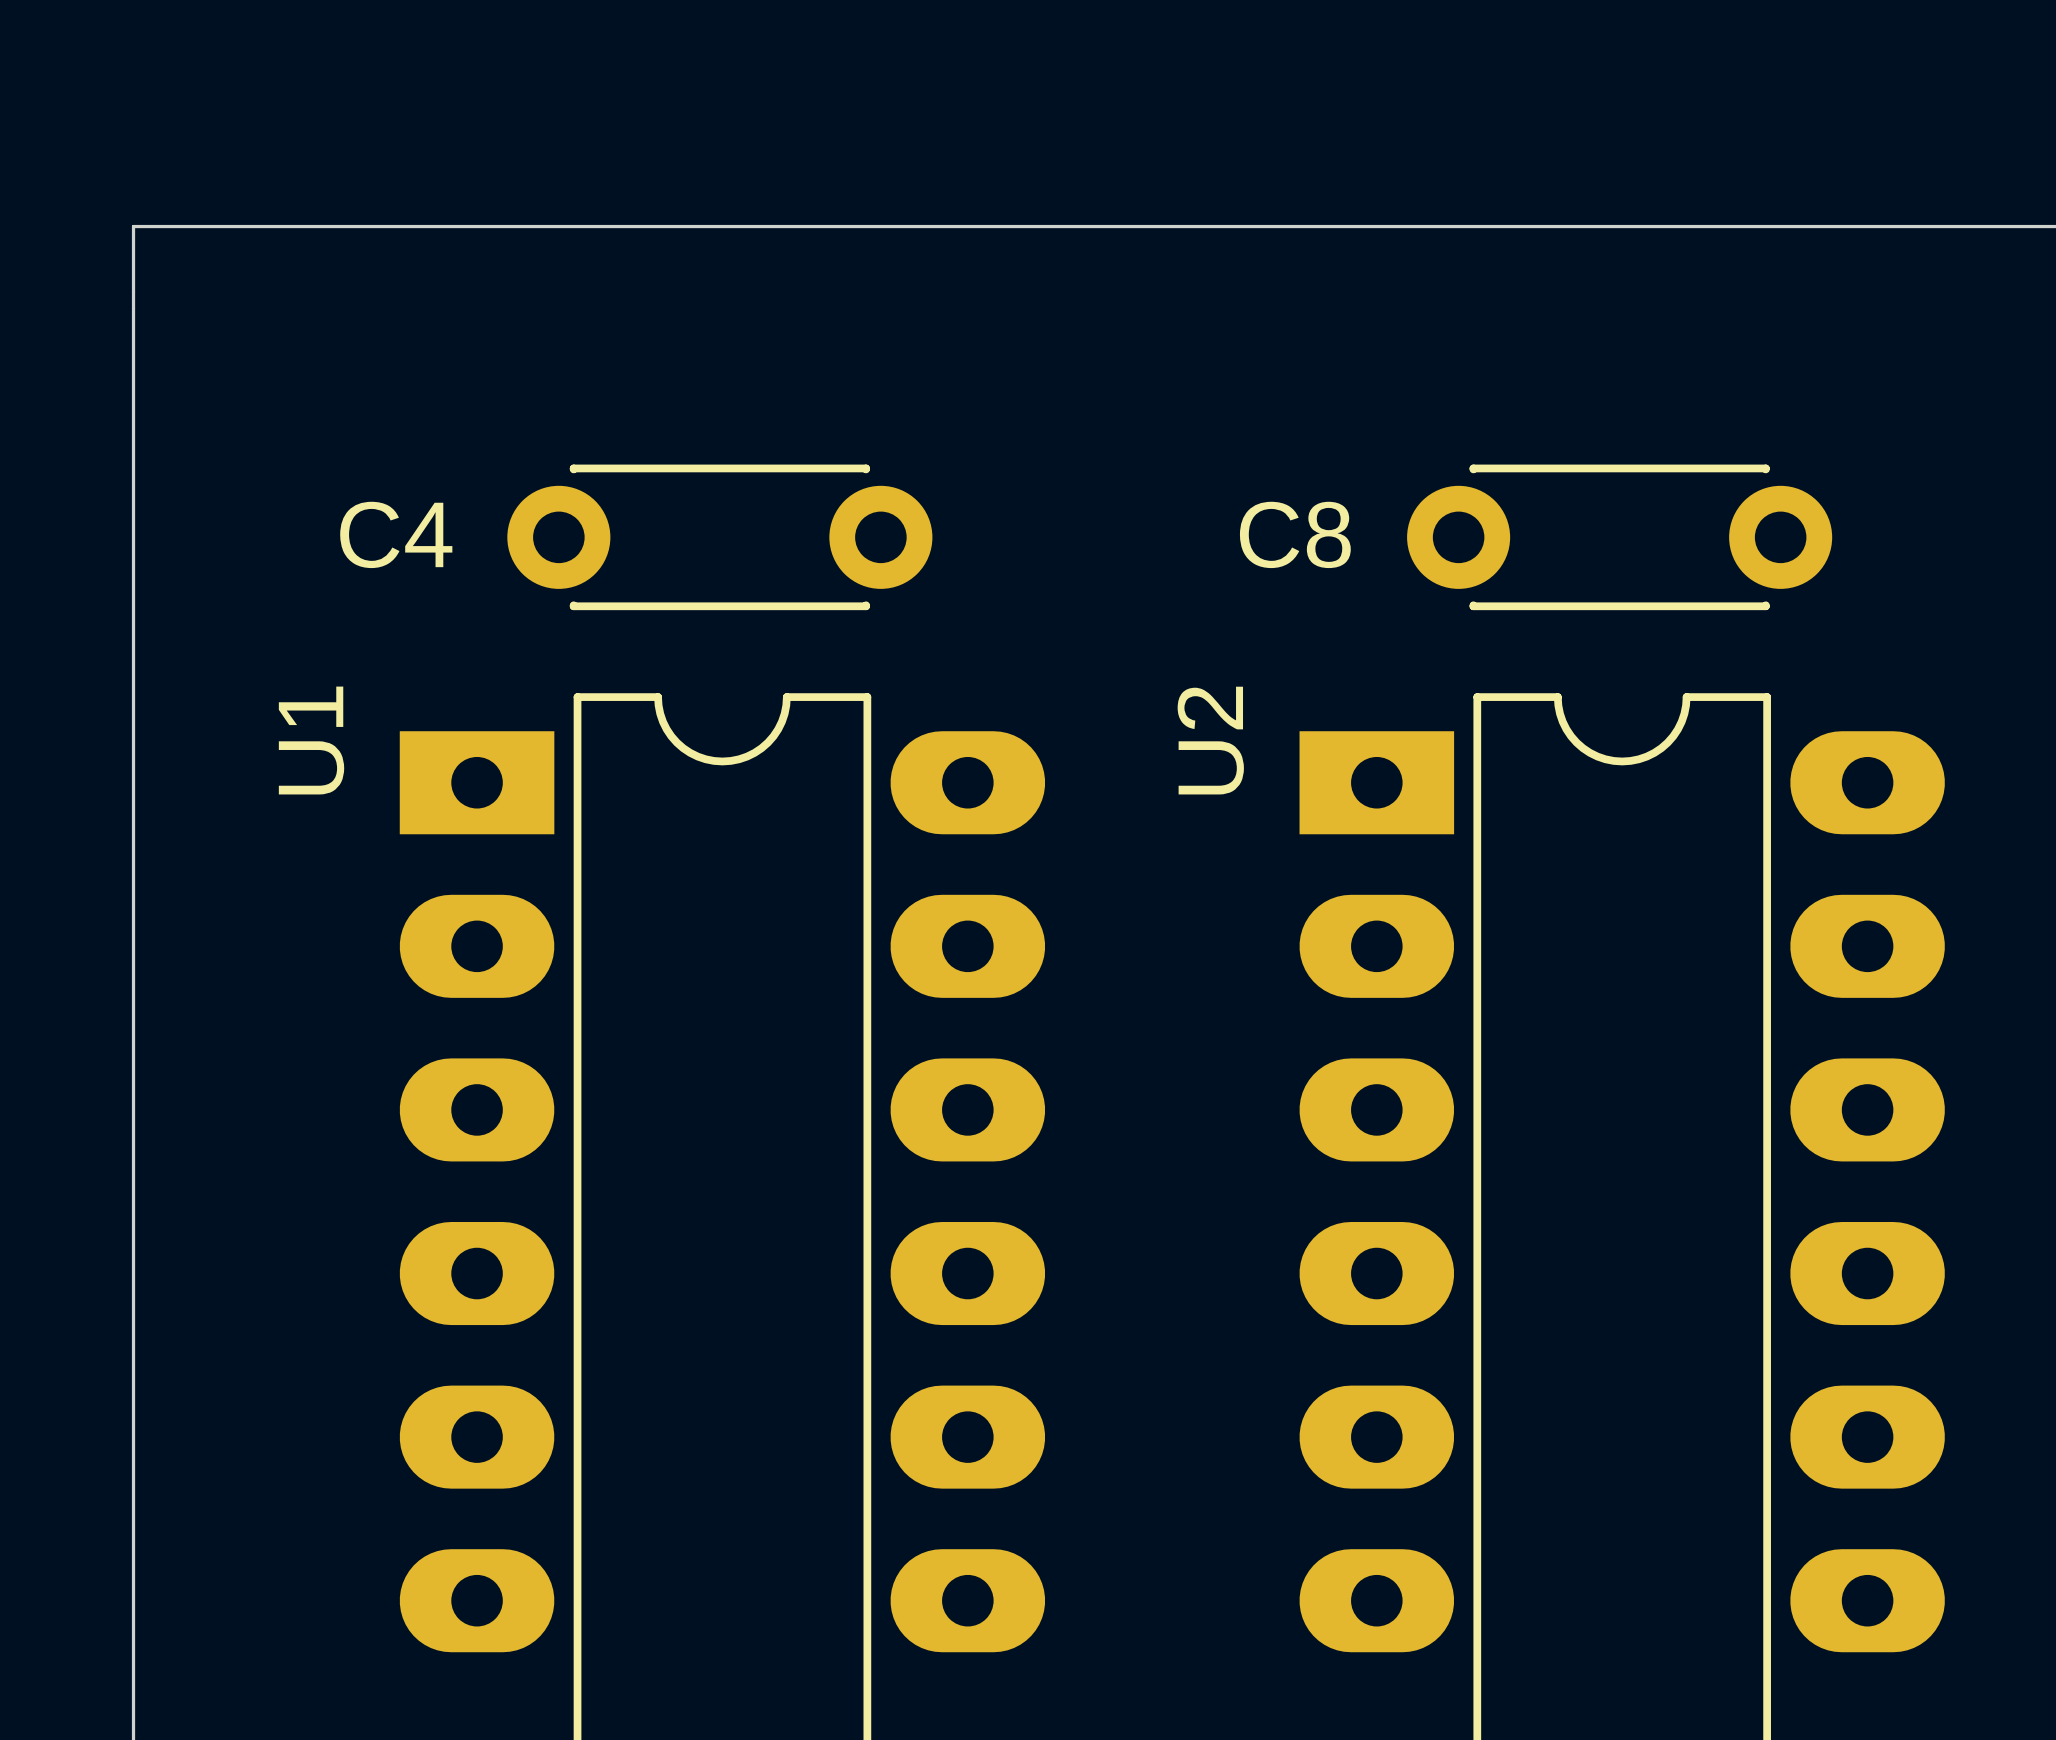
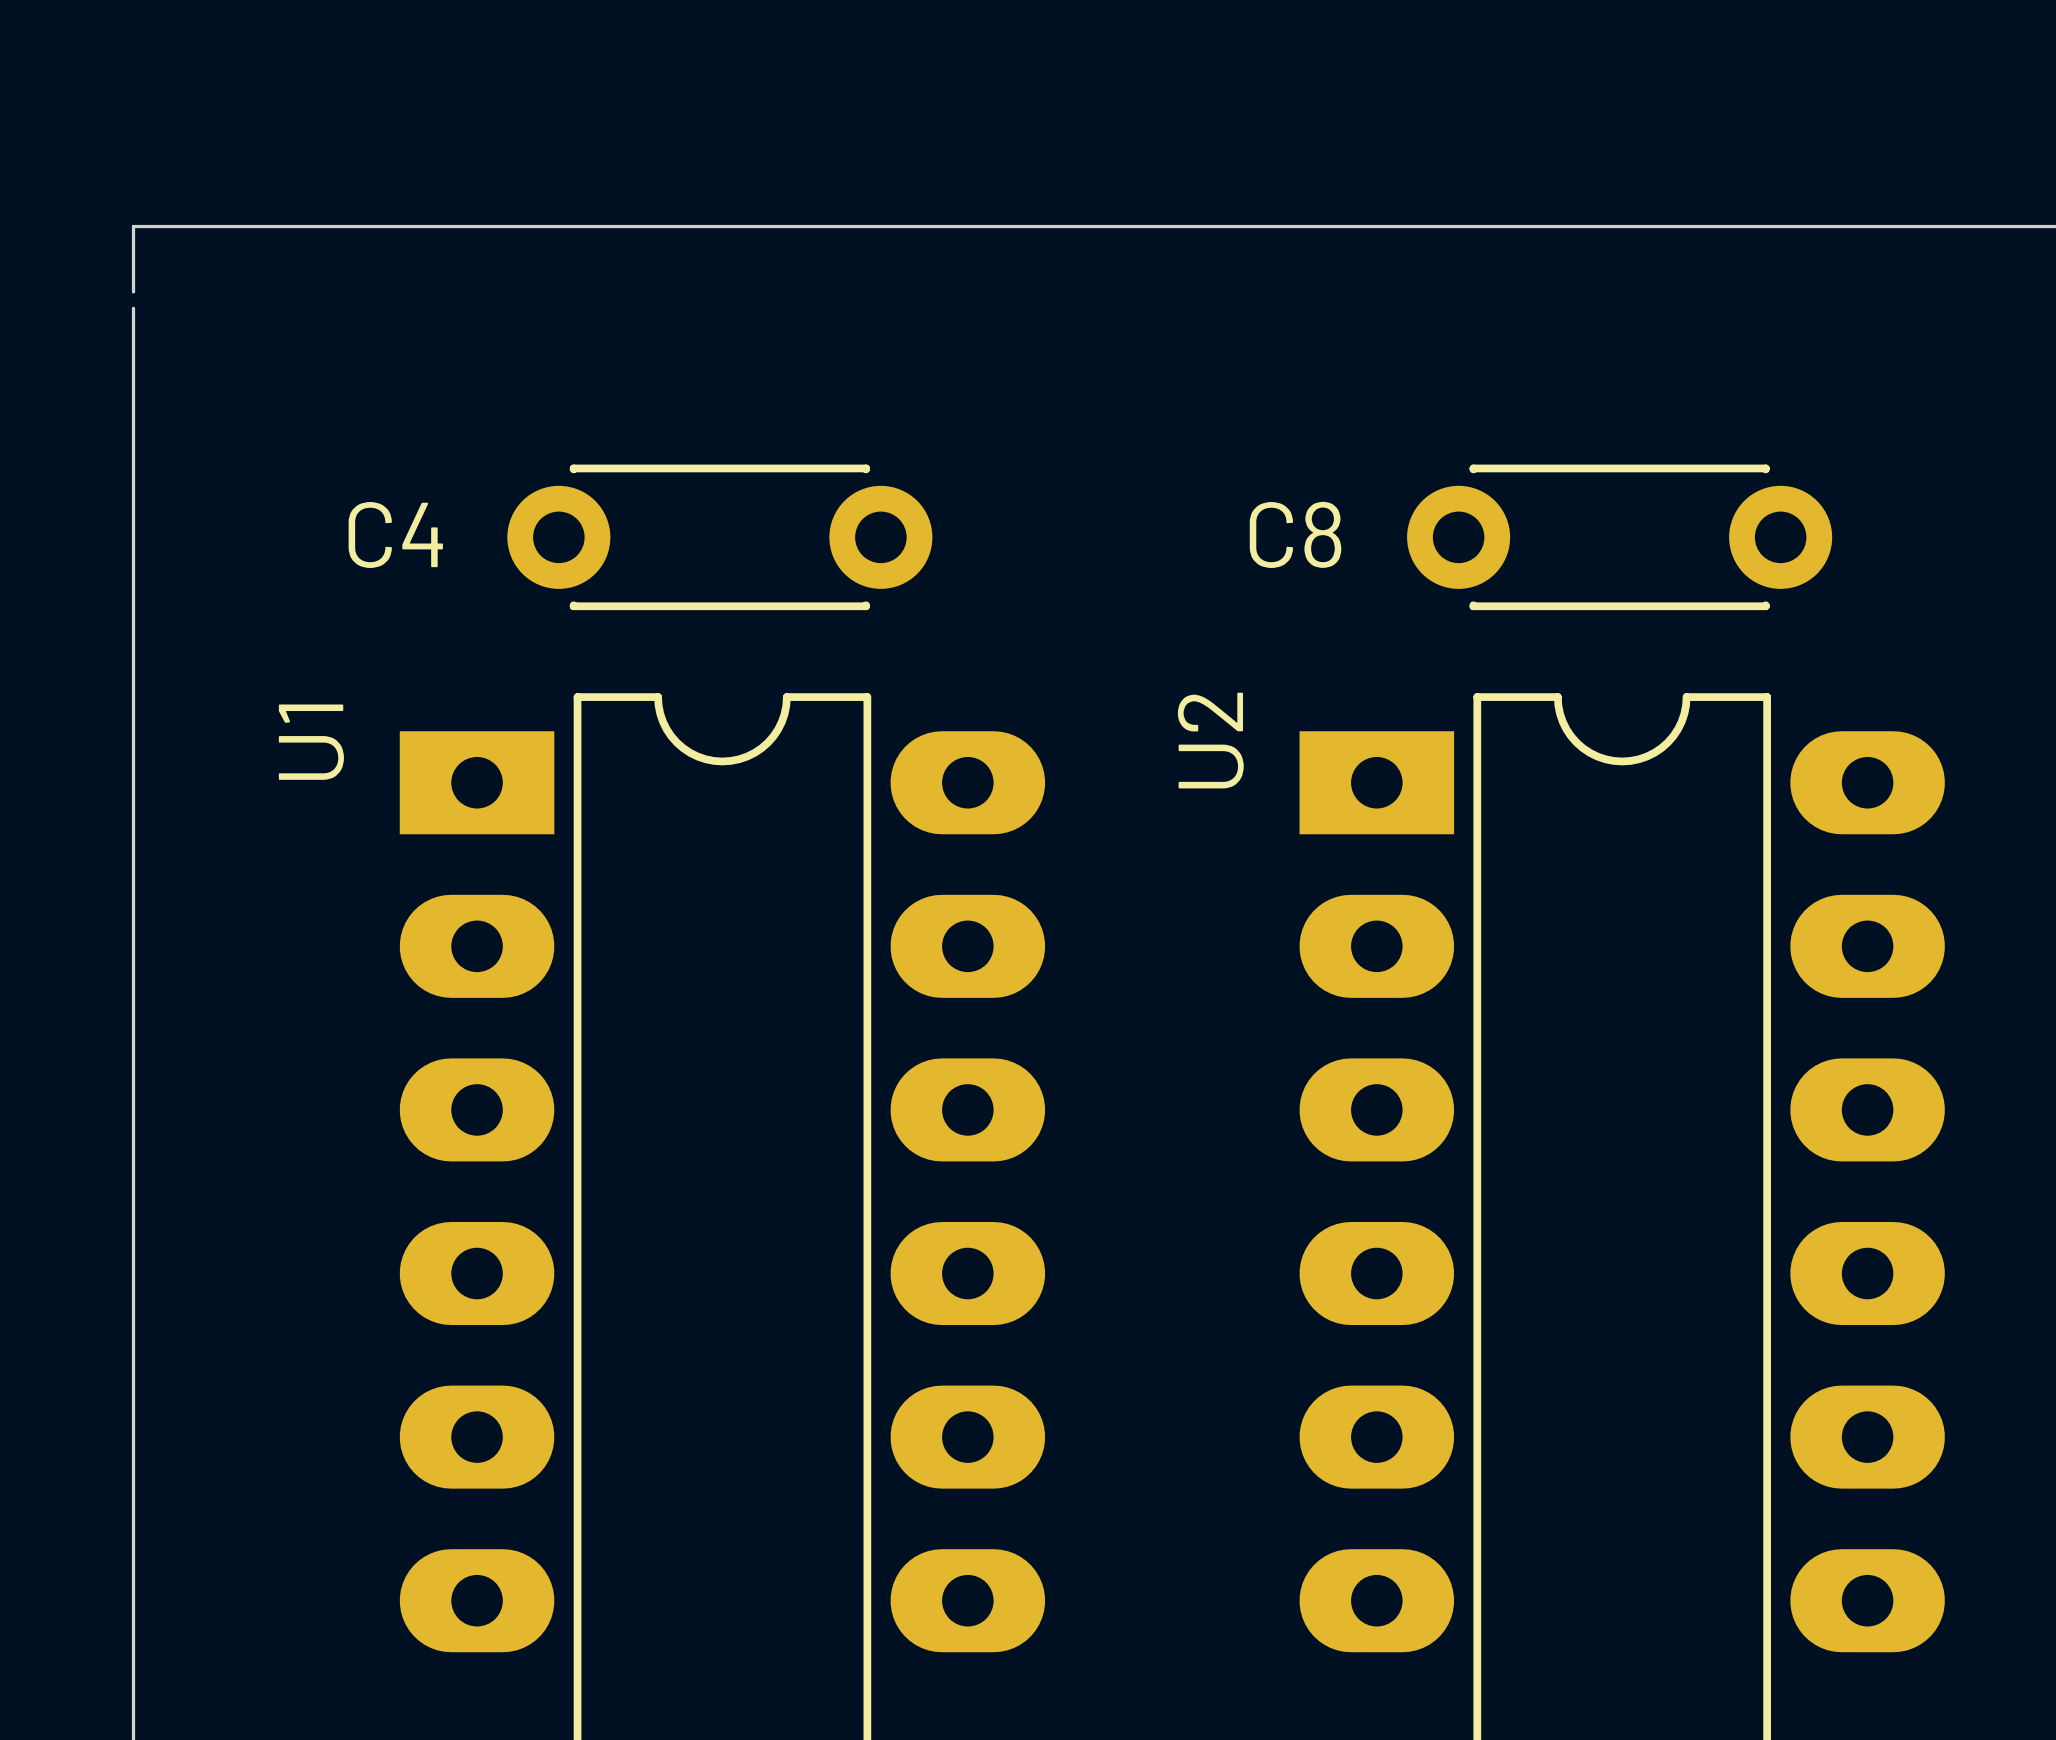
board edge: (133, 291) (133, 308) -> none

